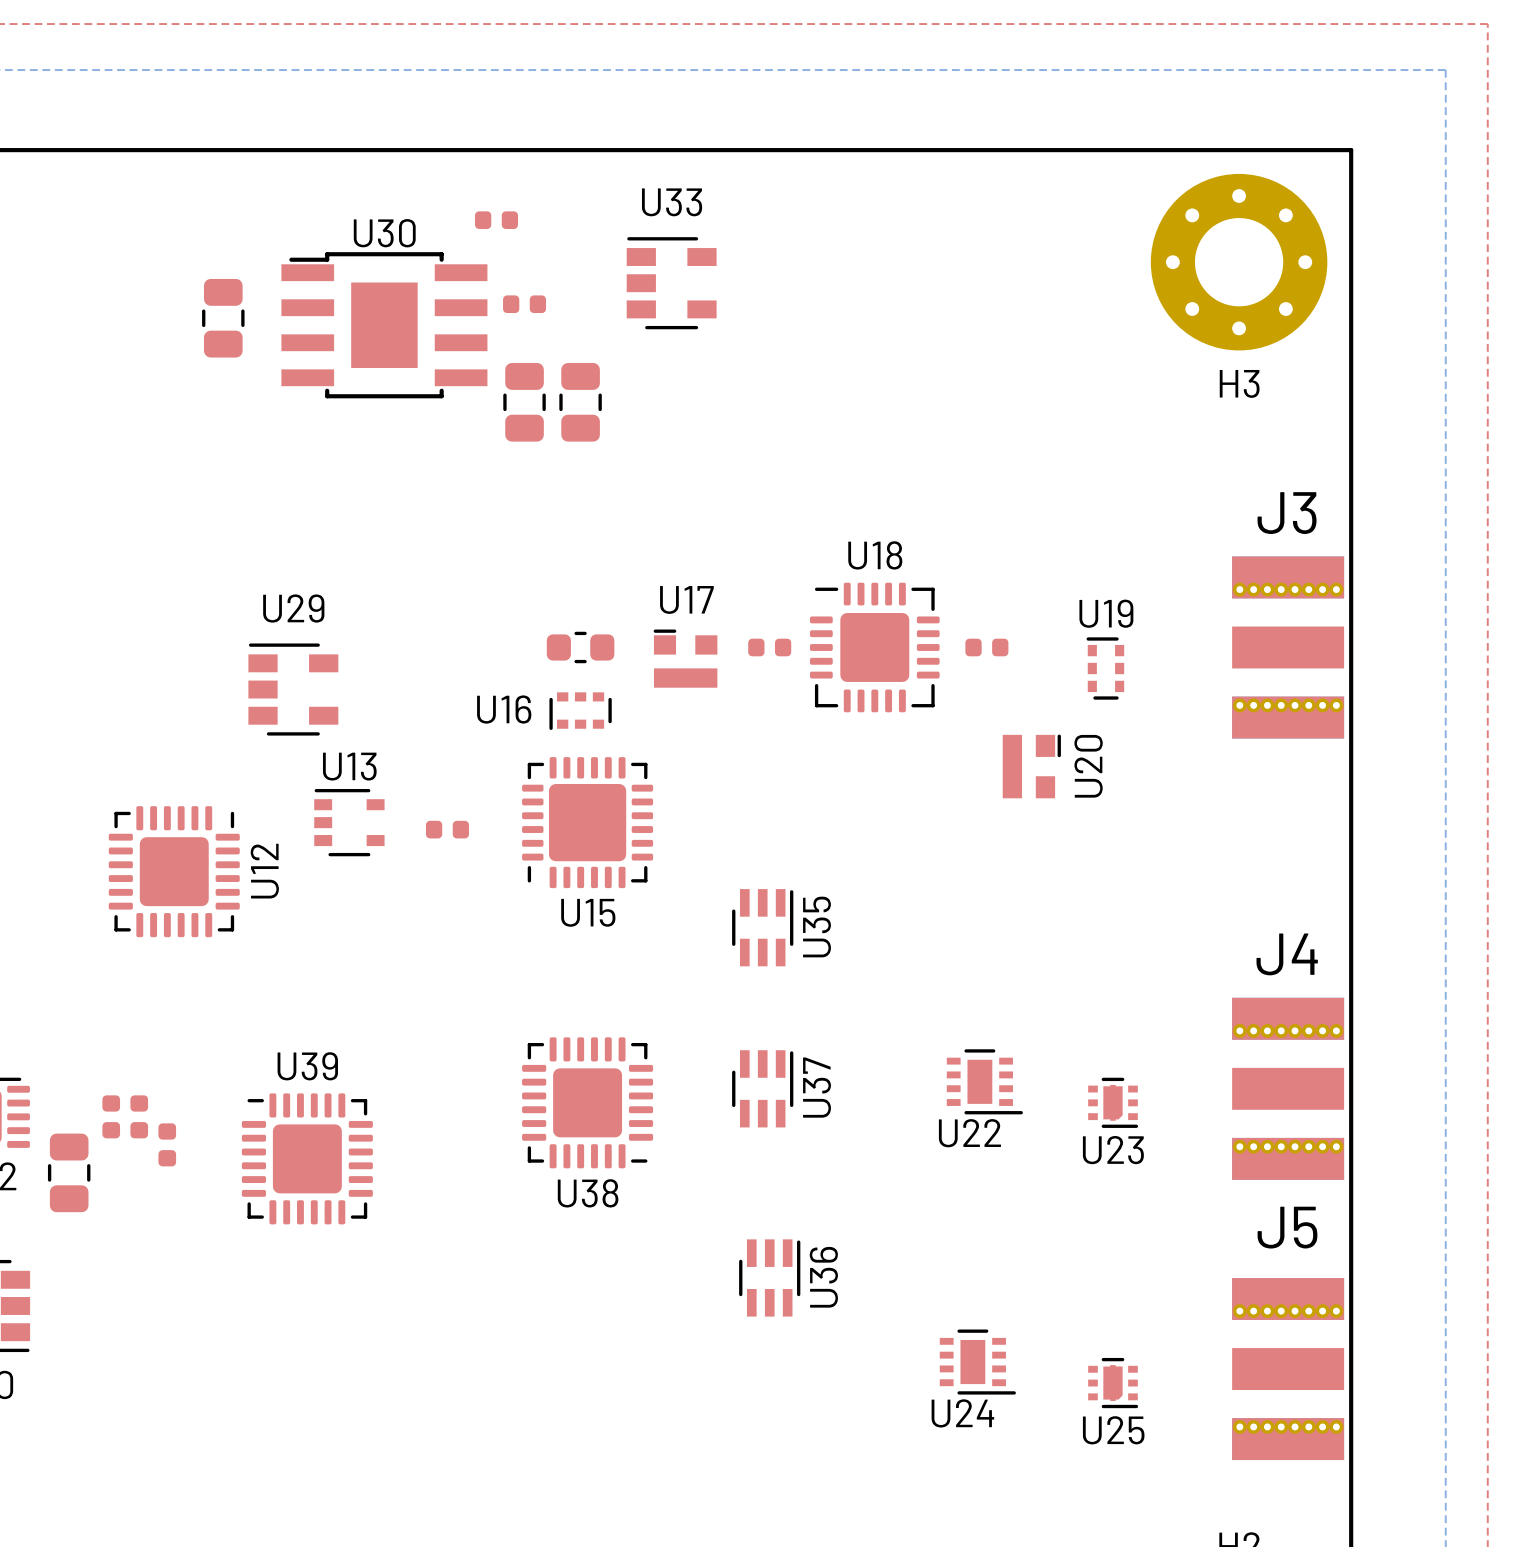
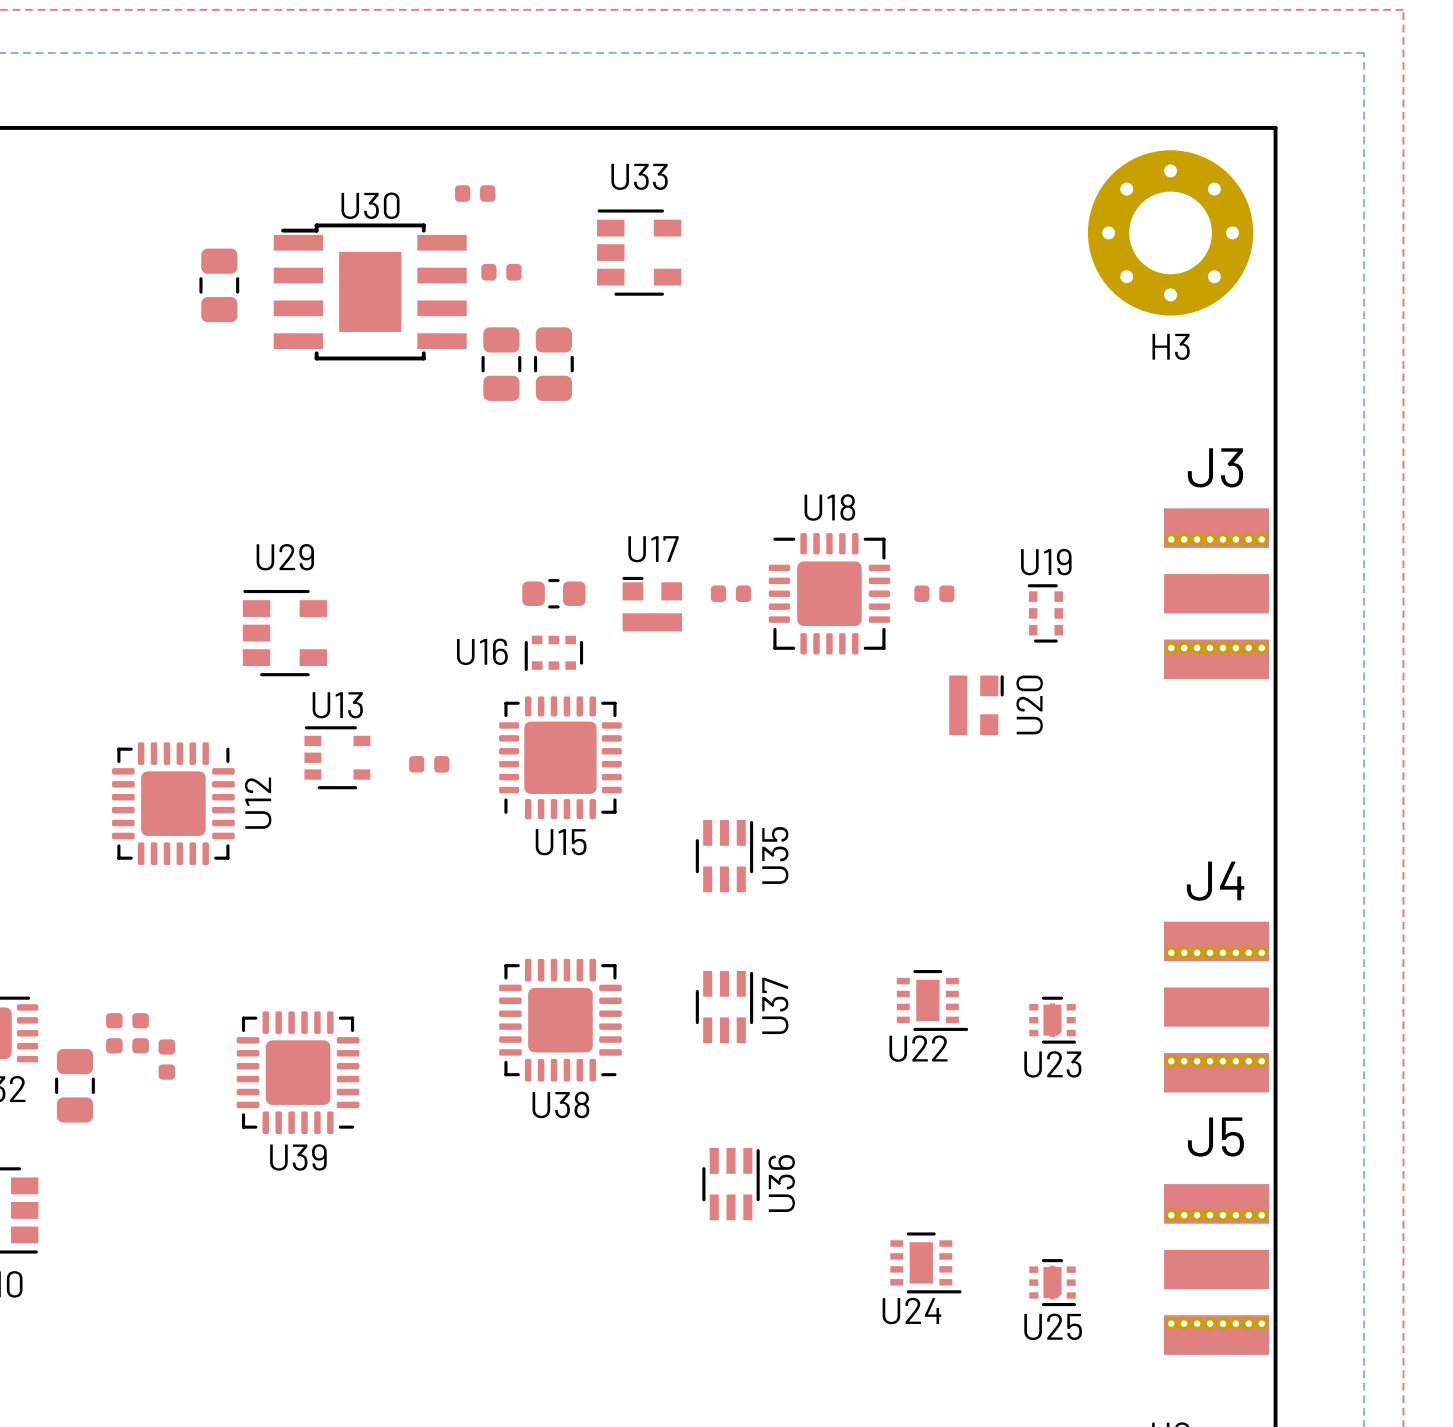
U39 rotation: 0° (307, 1158) -> 180° (298, 1072)

